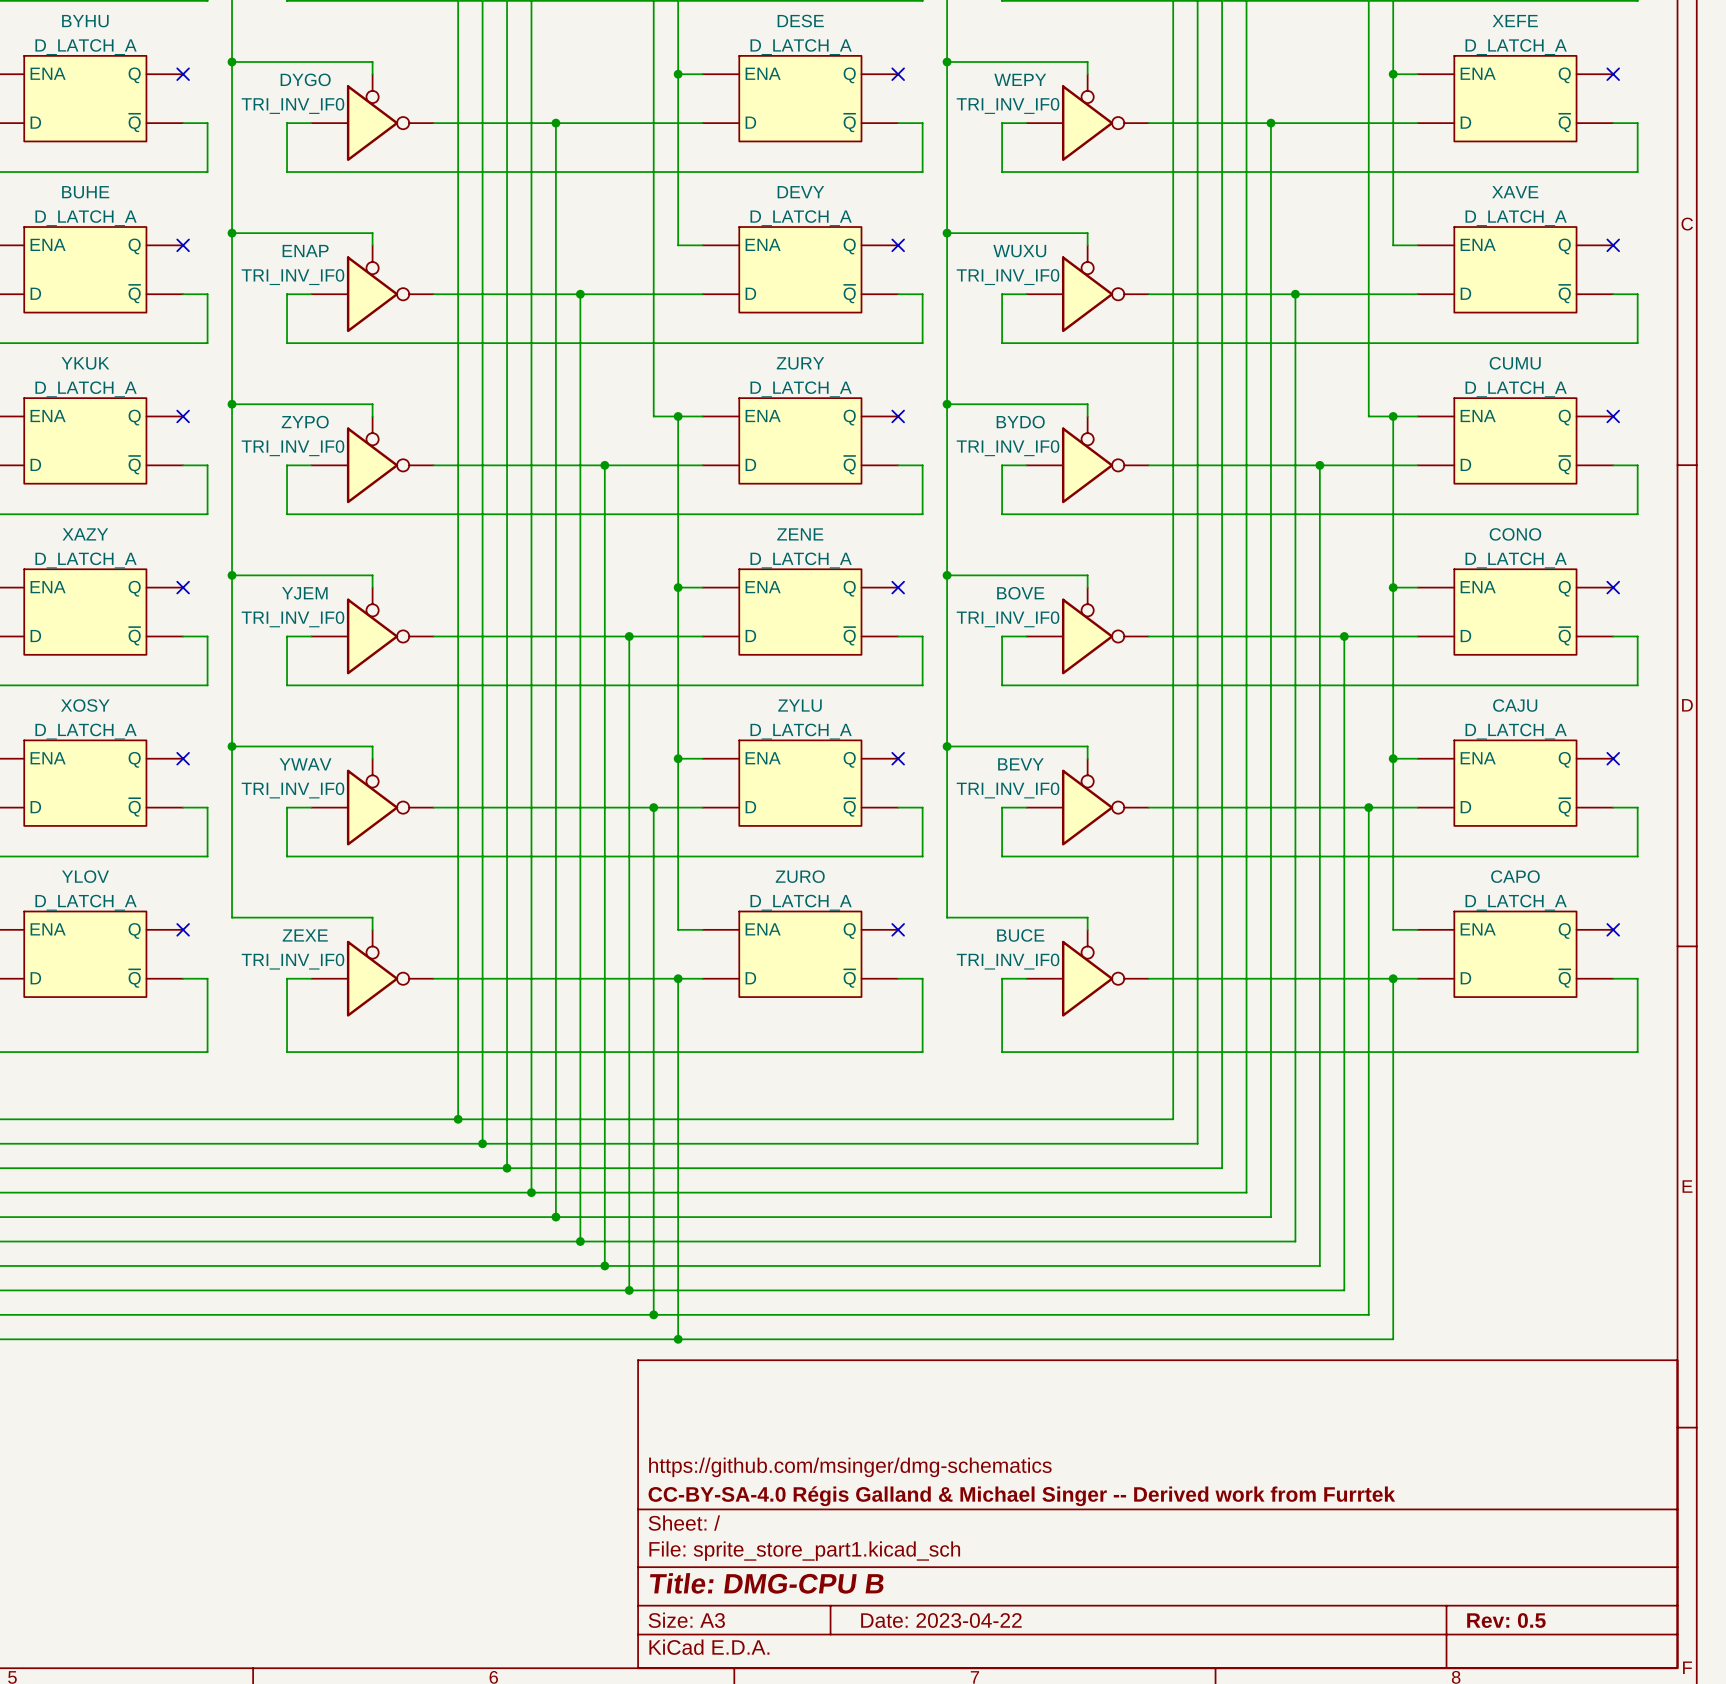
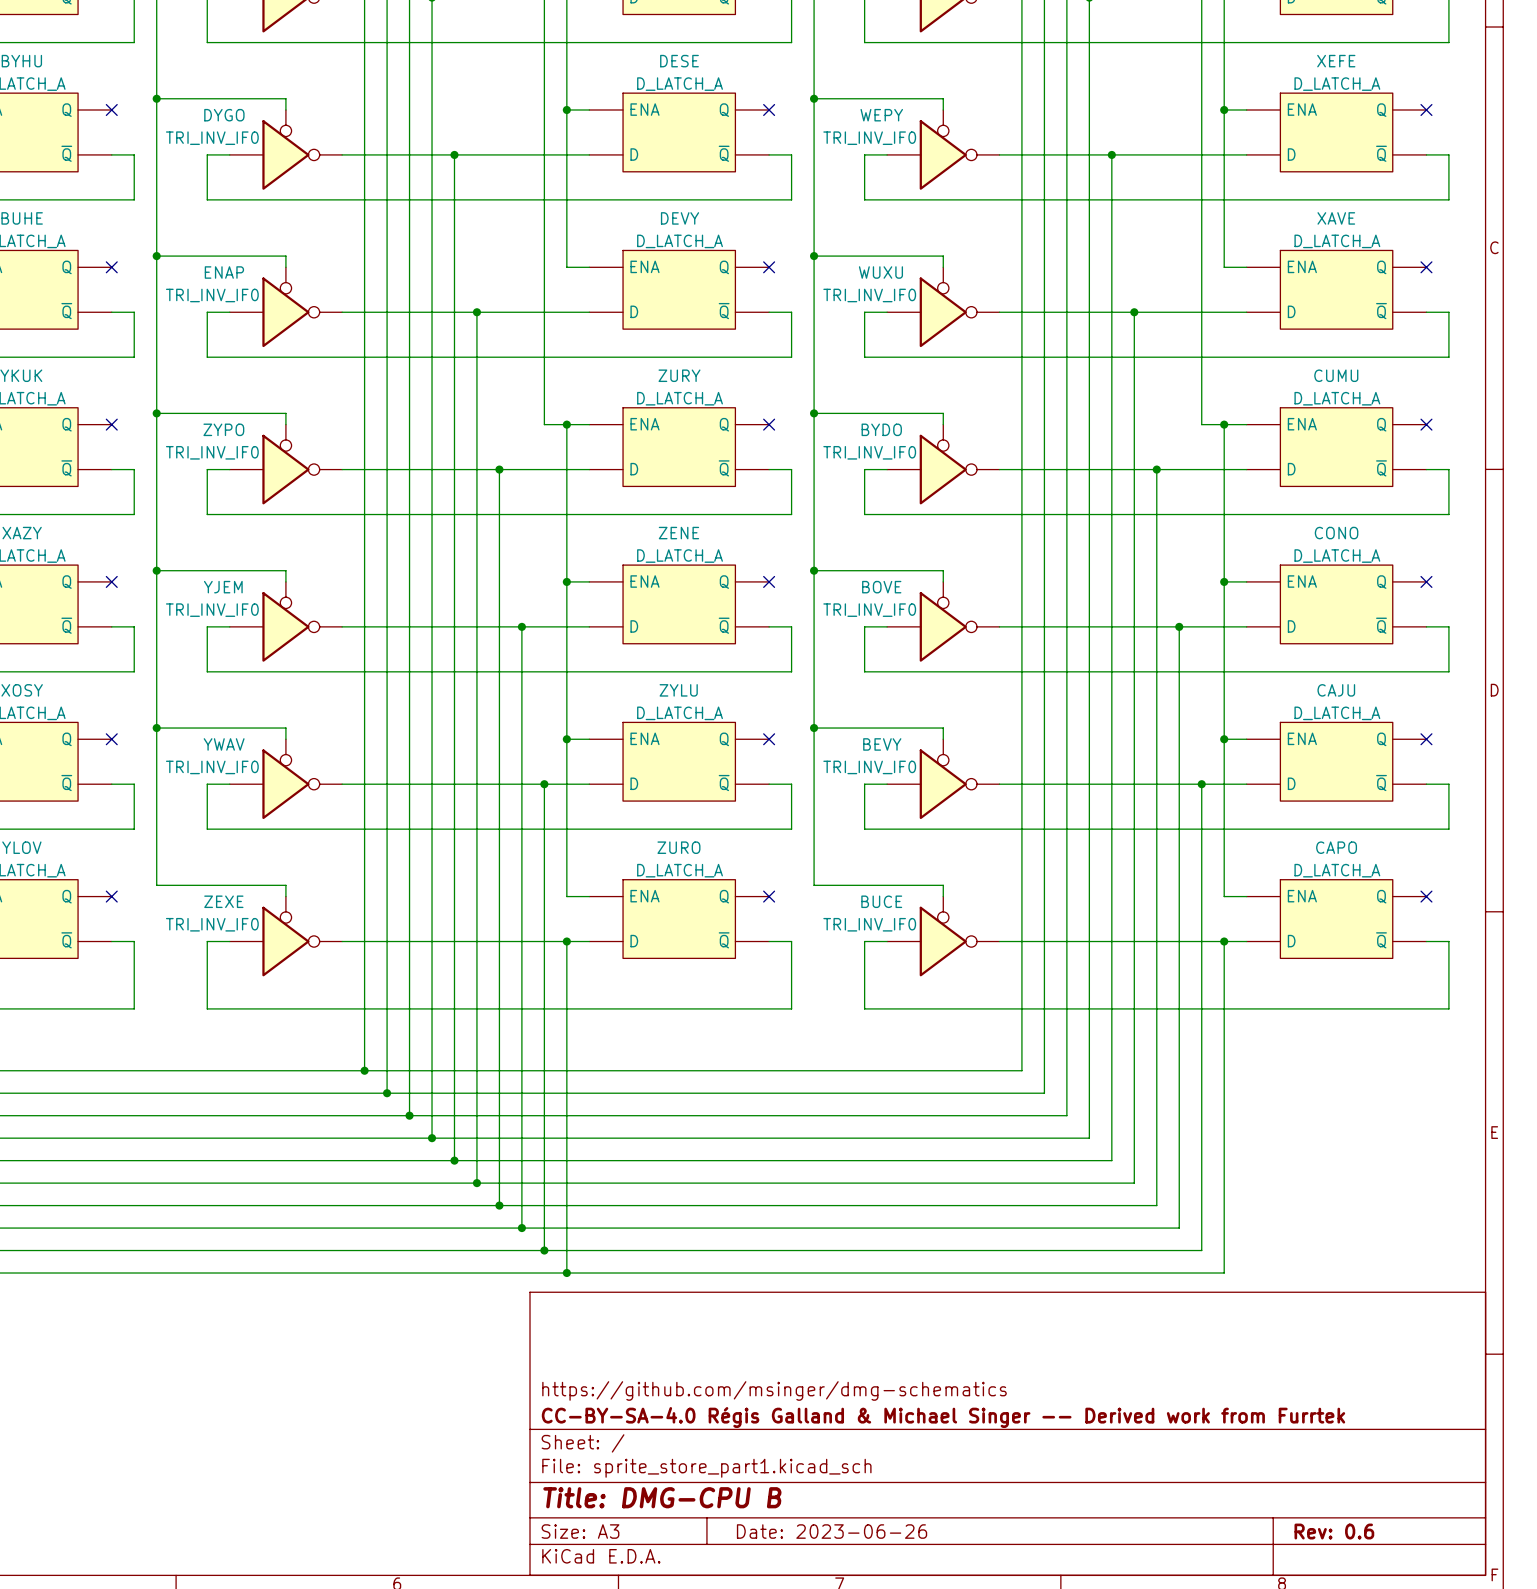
title block: Date: 2023-04-22 (941, 1620) -> Date: 2023-06-26 (832, 1531)
title block: Rev: 0.5 (1506, 1620) -> Rev: 0.6 (1334, 1531)

